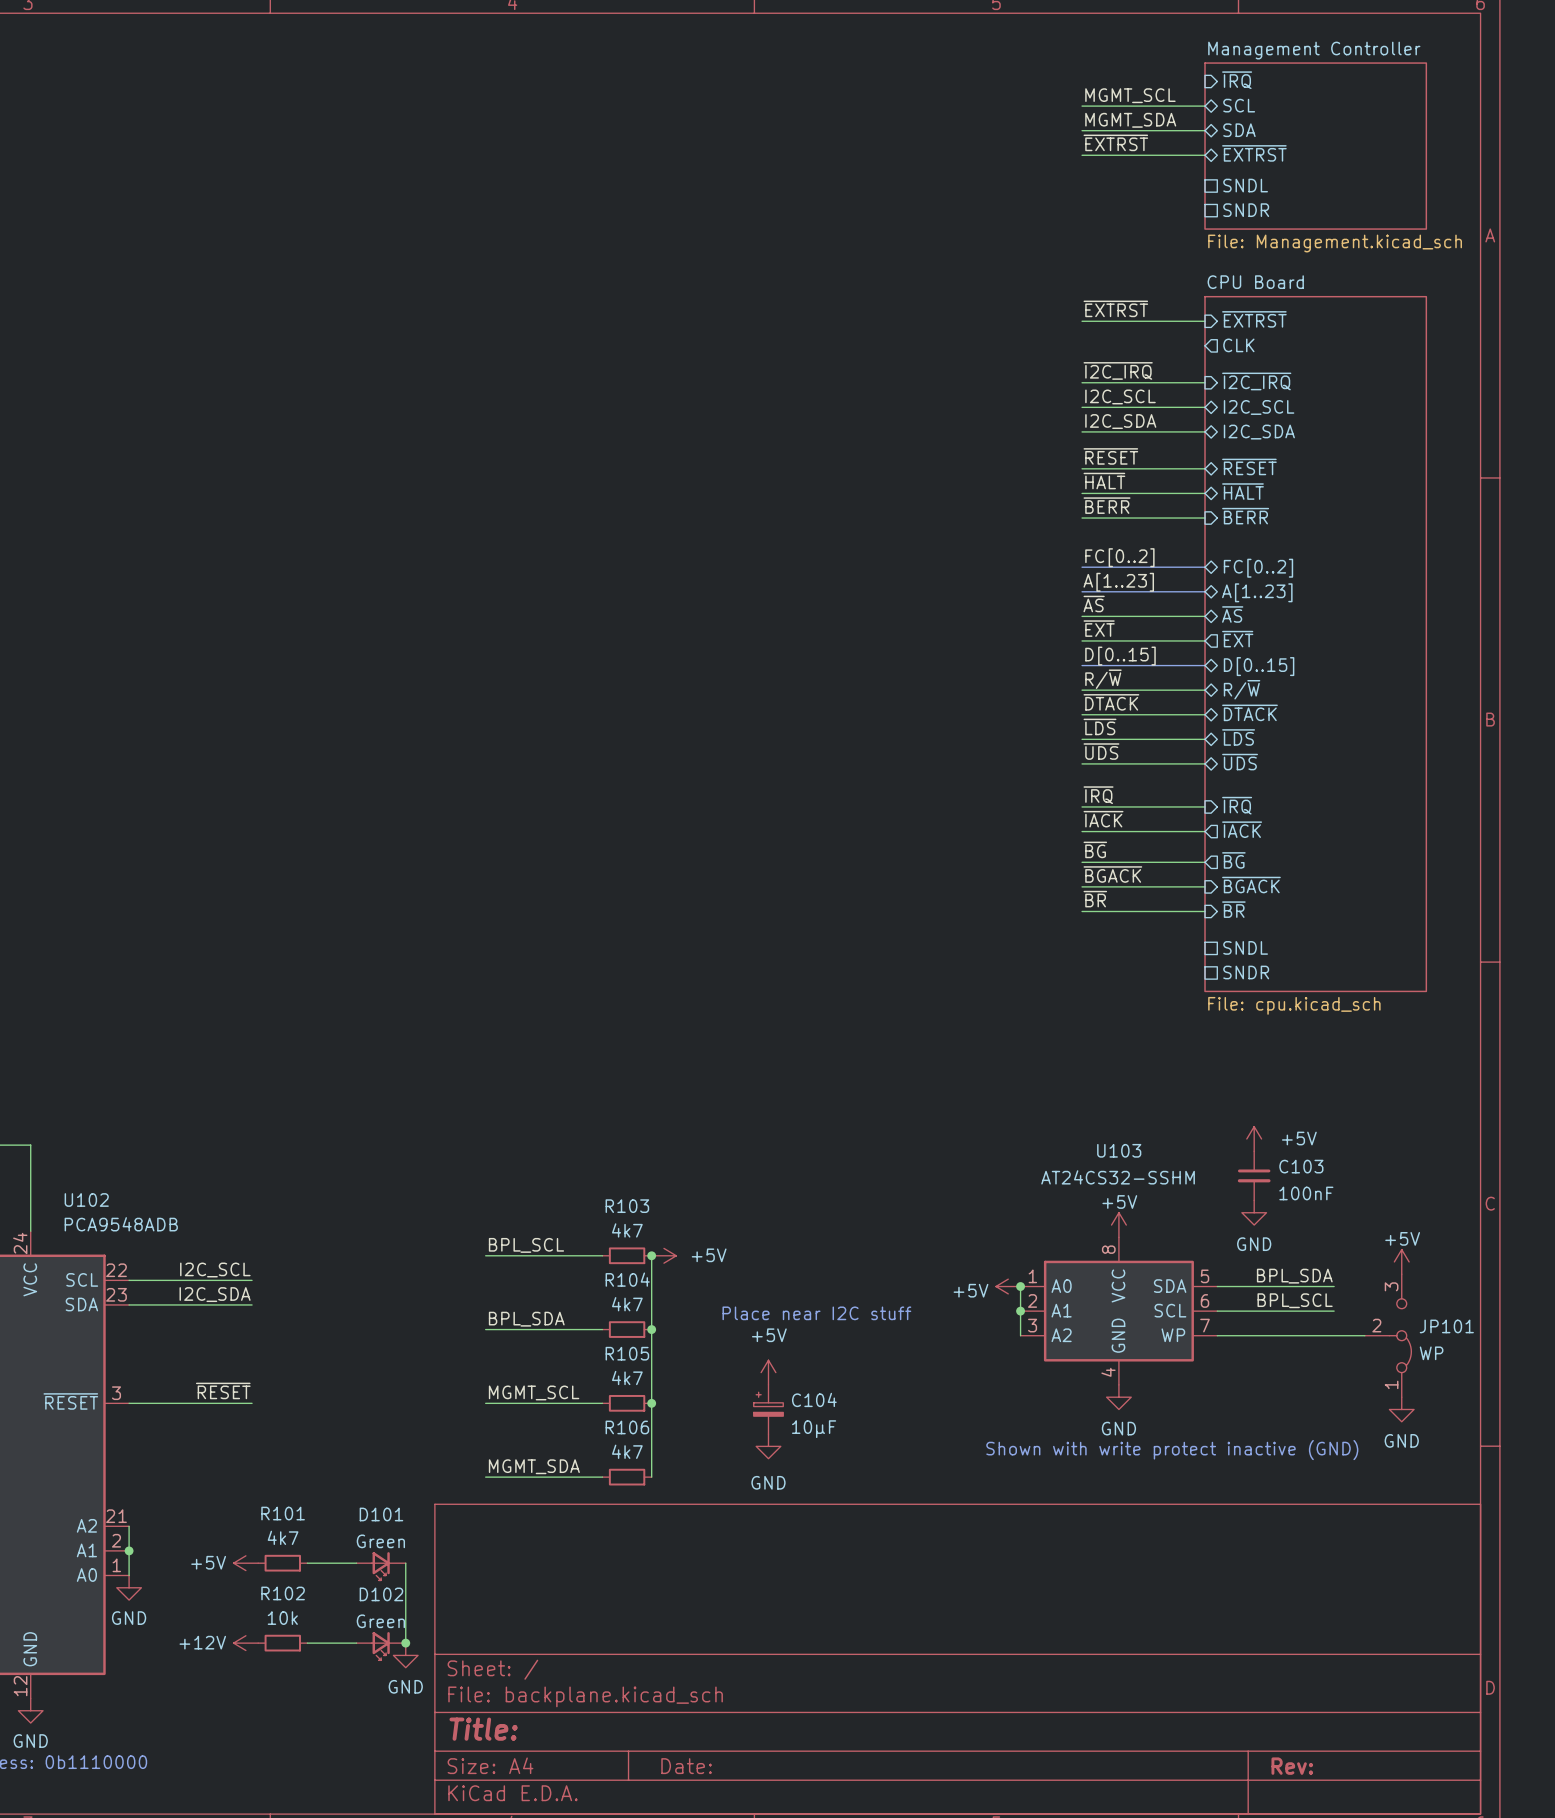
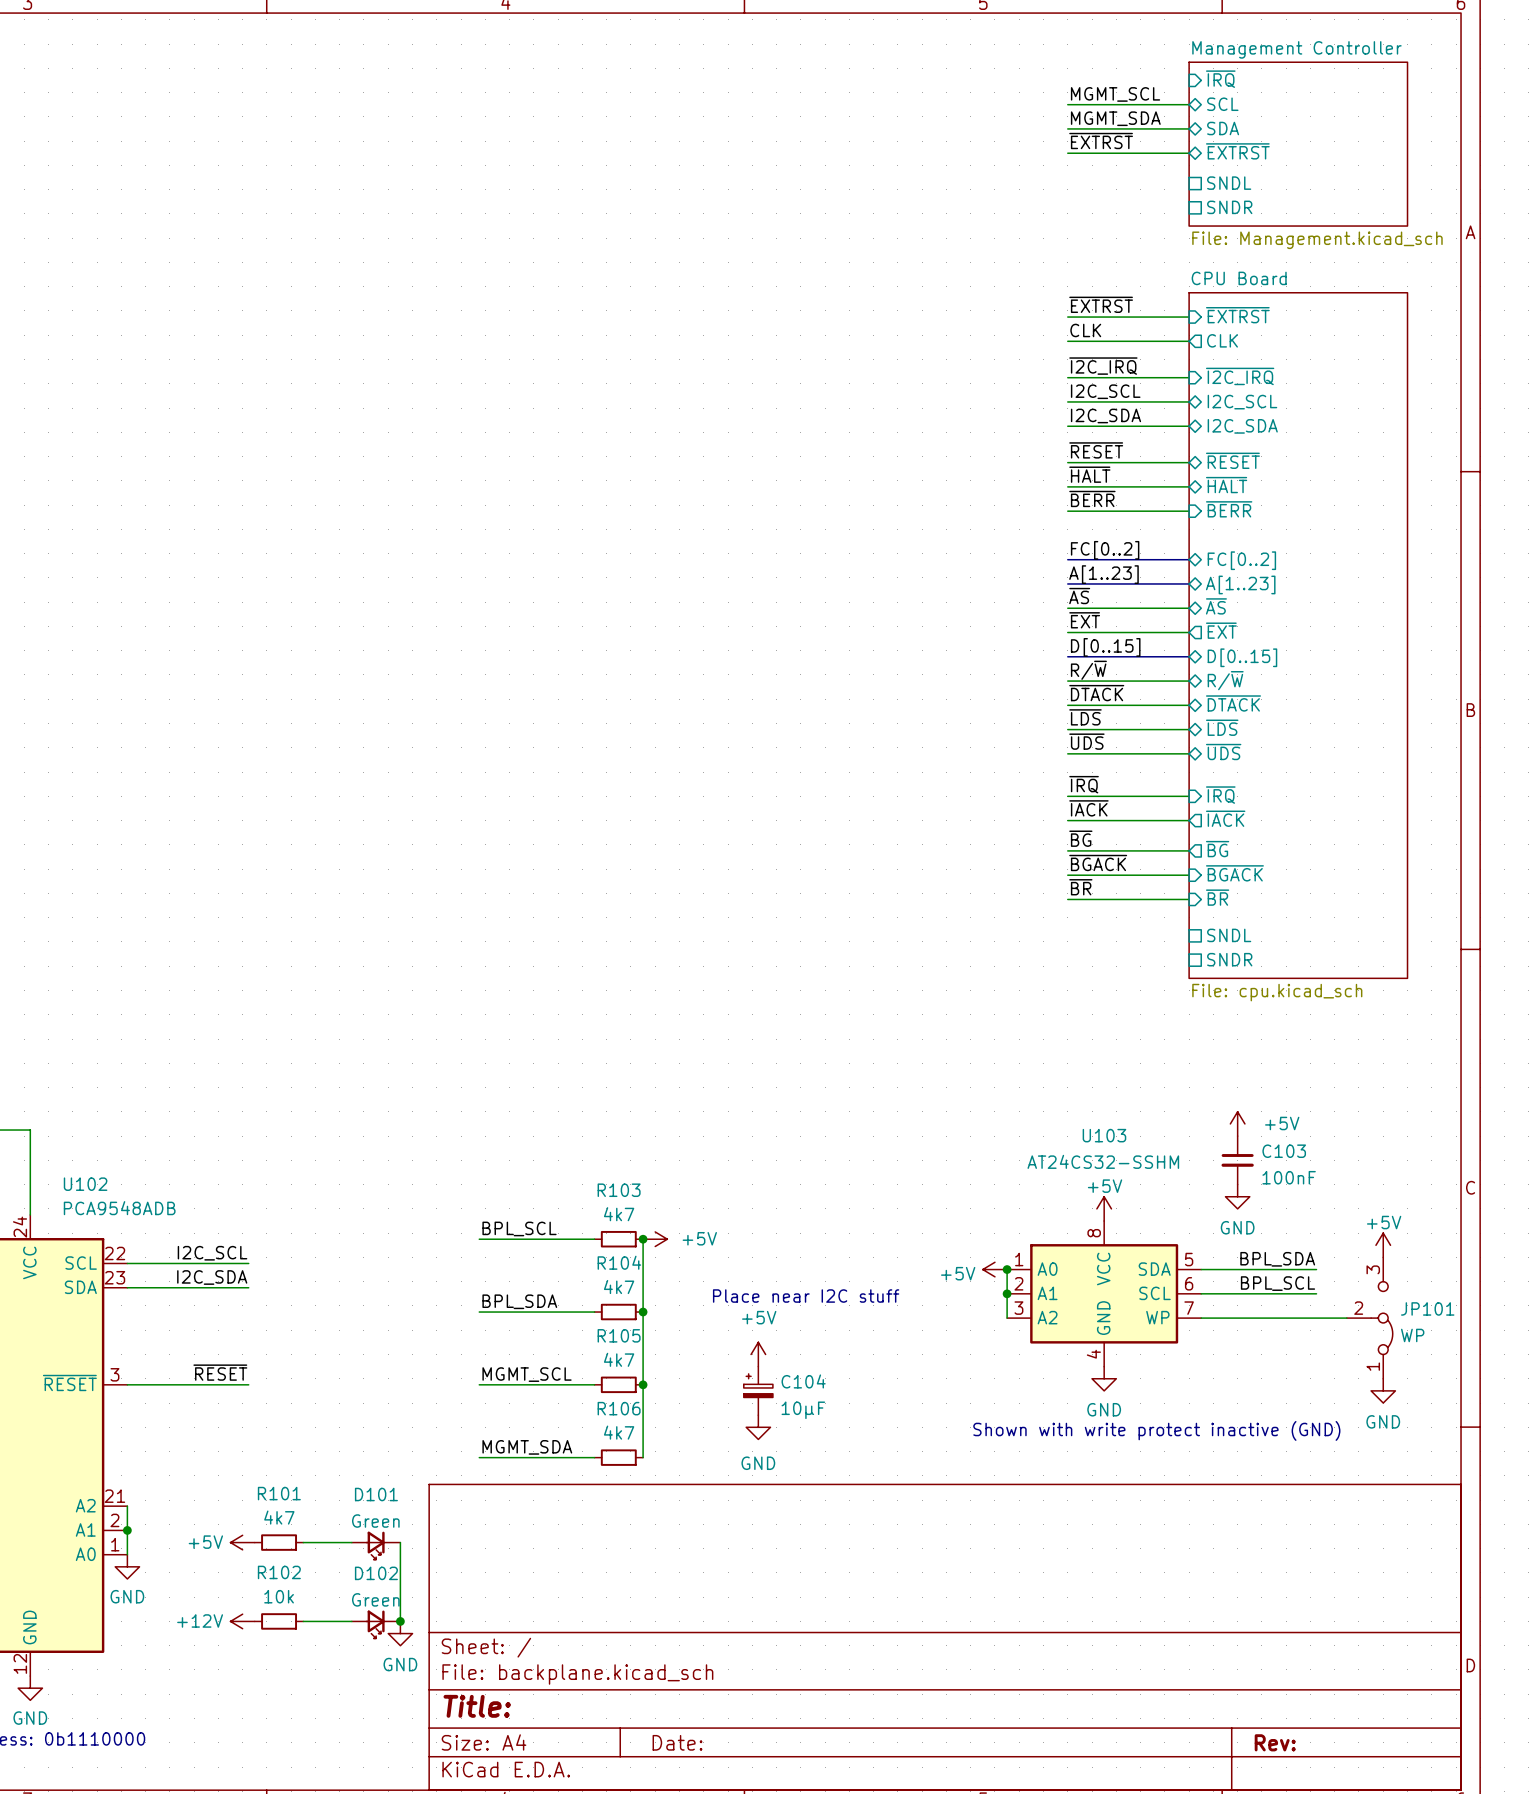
label: none -> CLK (1085, 330)
wire: none -> (1067, 341) (1189, 341)

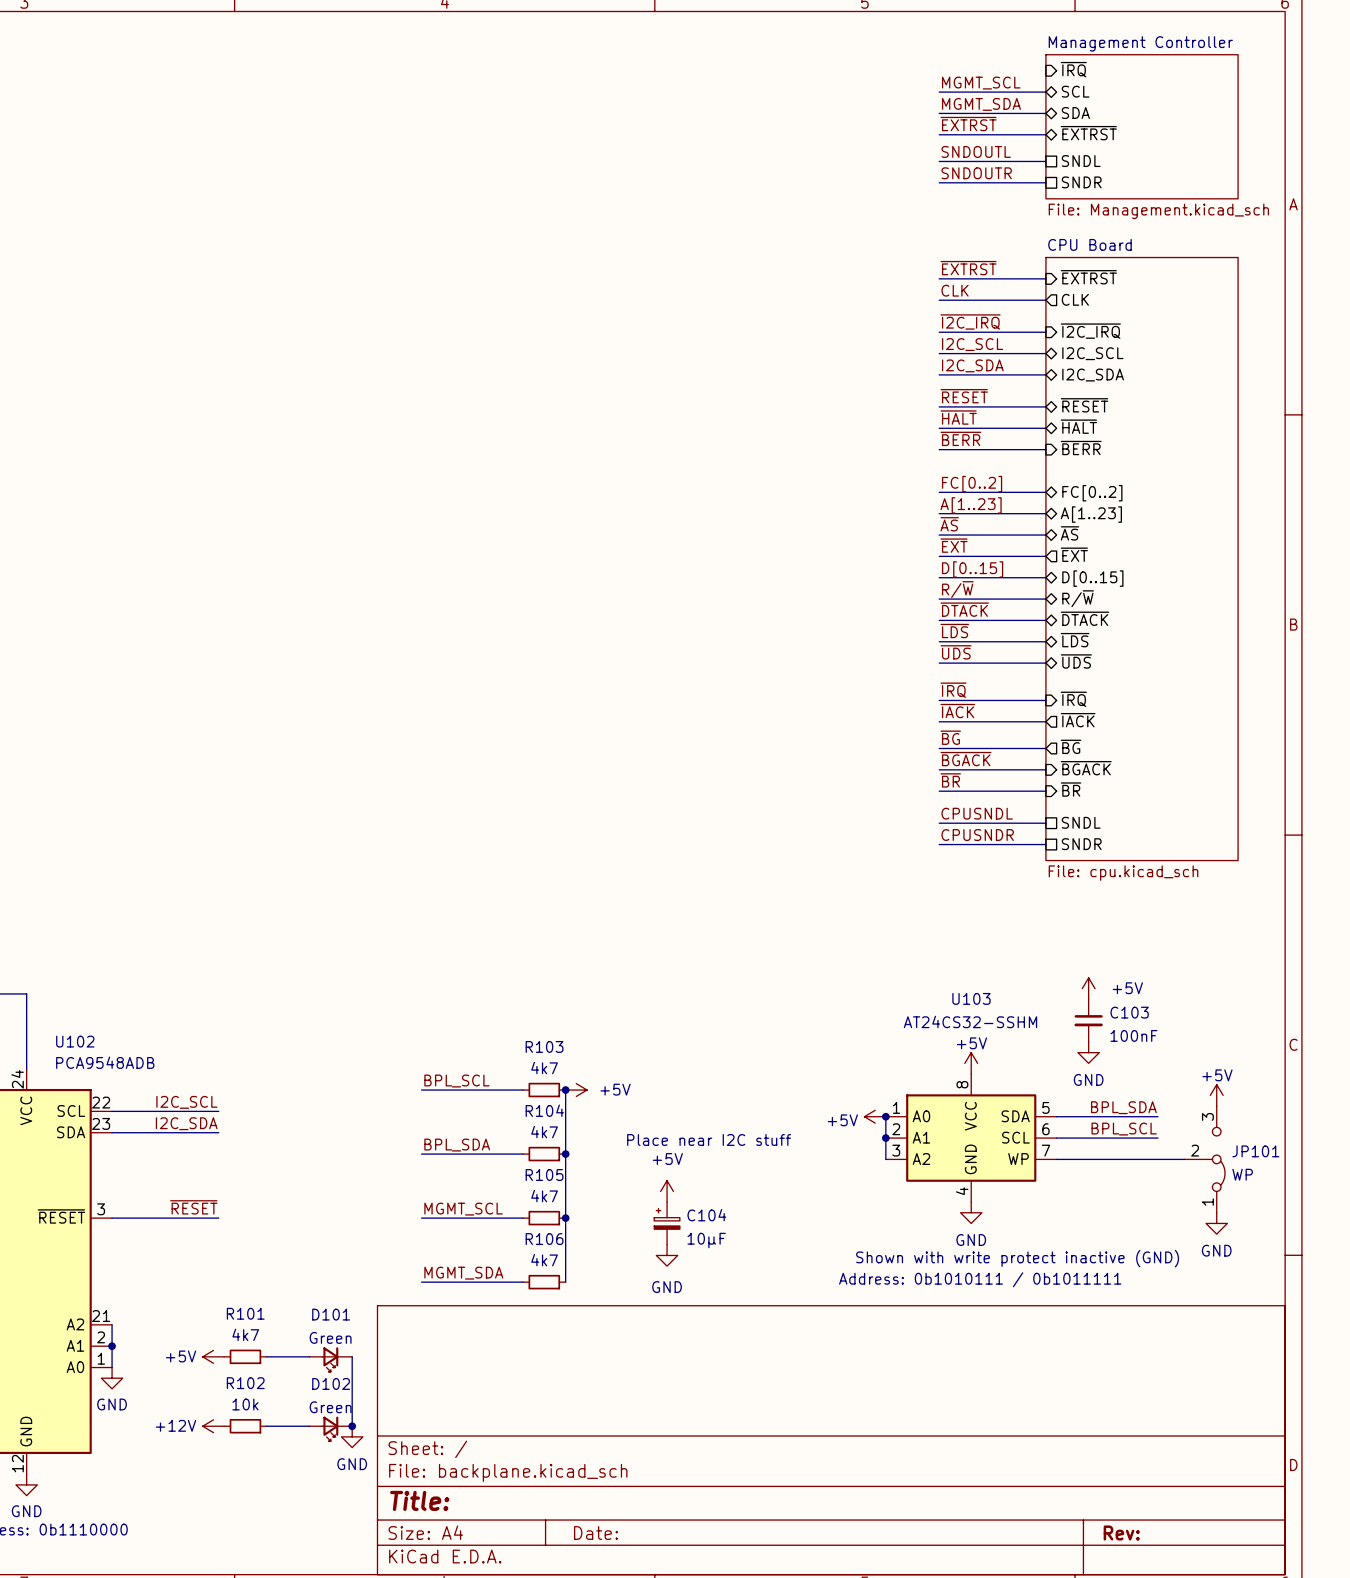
label: none -> SNDOUTL (976, 151)
wire: none -> (939, 161) (1045, 161)
label: none -> SNDOUTR (976, 173)
wire: none -> (939, 182) (1045, 182)
label: none -> CPUSNDL (977, 813)
wire: none -> (939, 823) (1045, 823)
label: none -> CPUSNDR (977, 835)
wire: none -> (939, 844) (1045, 844)
text: none -> Address: 0b1010111 / 0b1011111 (980, 1279)

